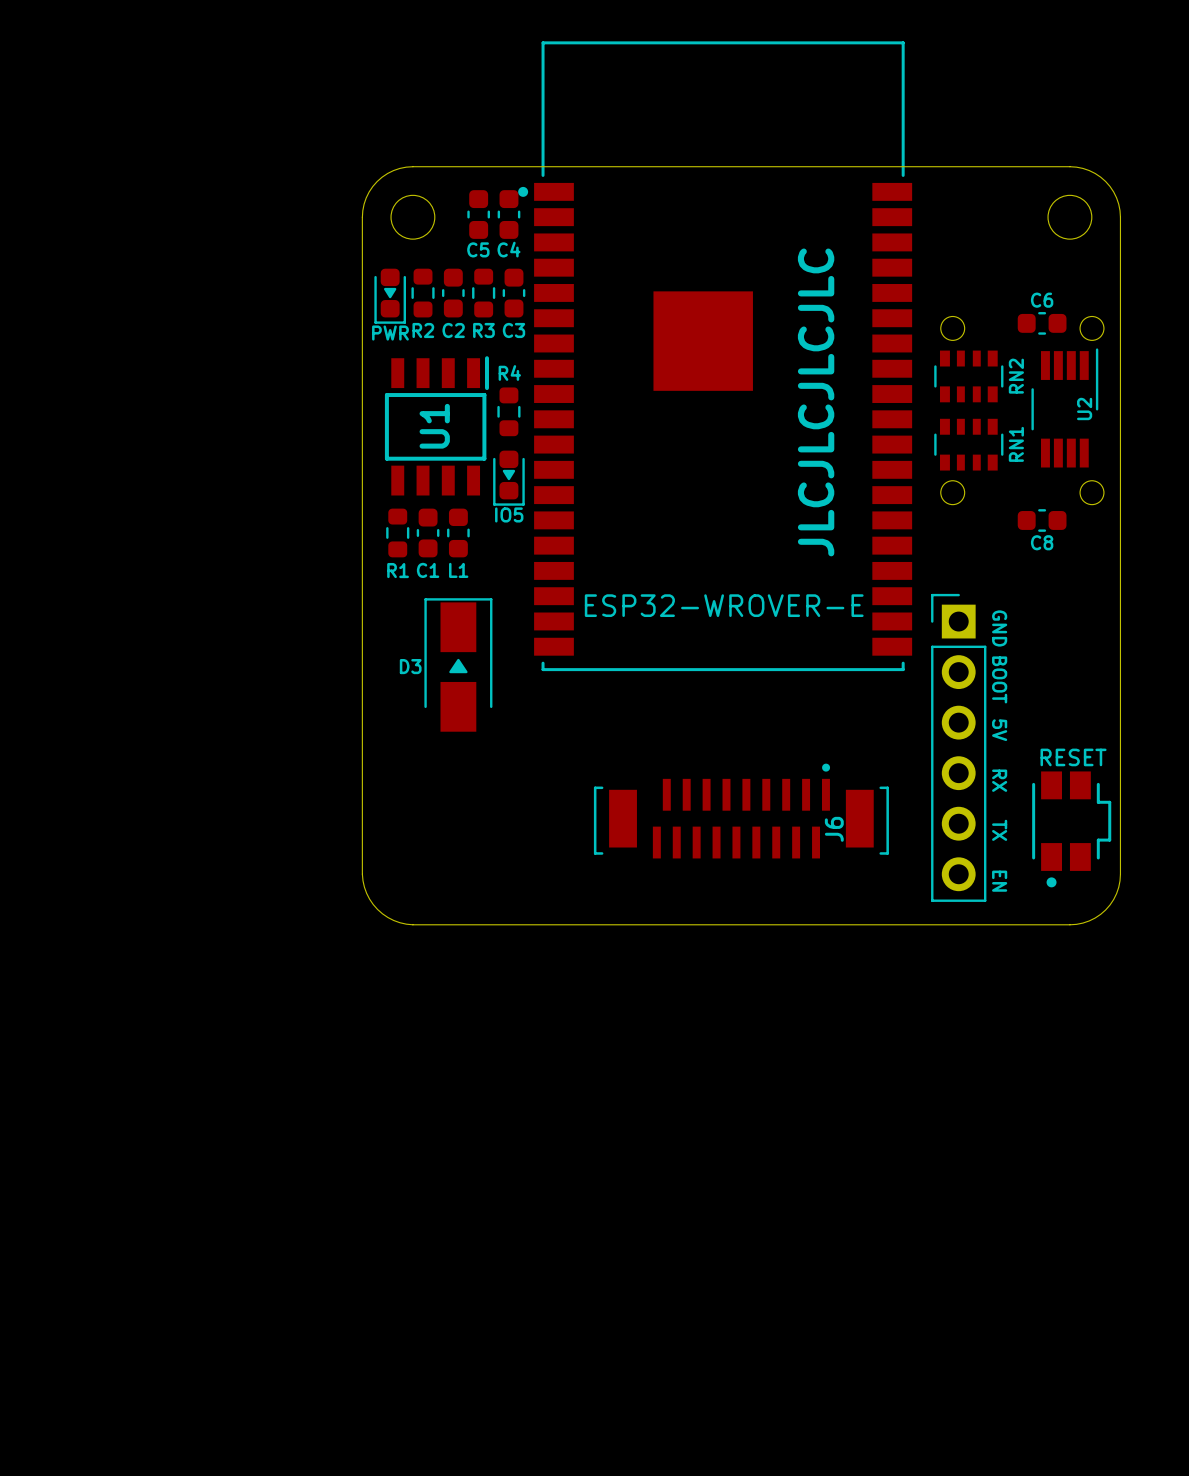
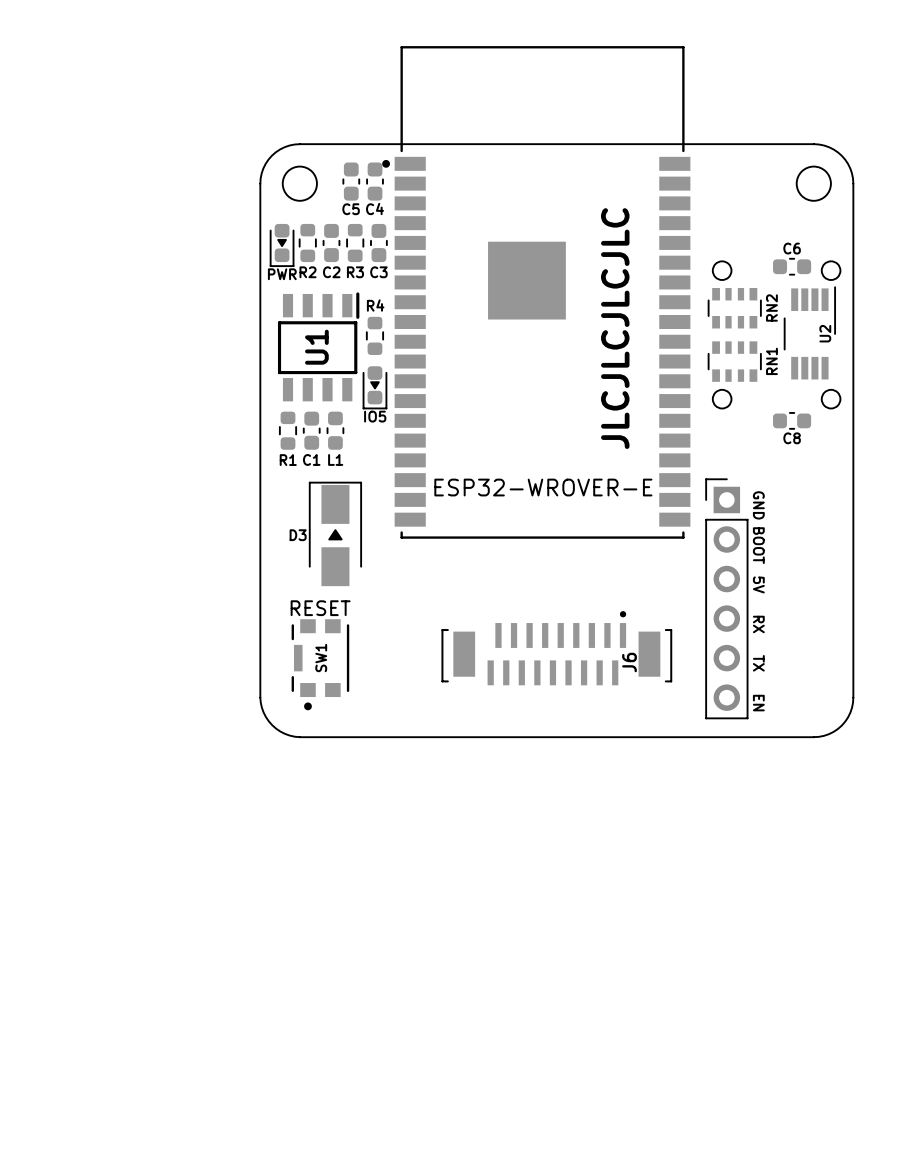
part: RESET (1071, 829) -> none
SW1: none -> RESET (320, 664)

